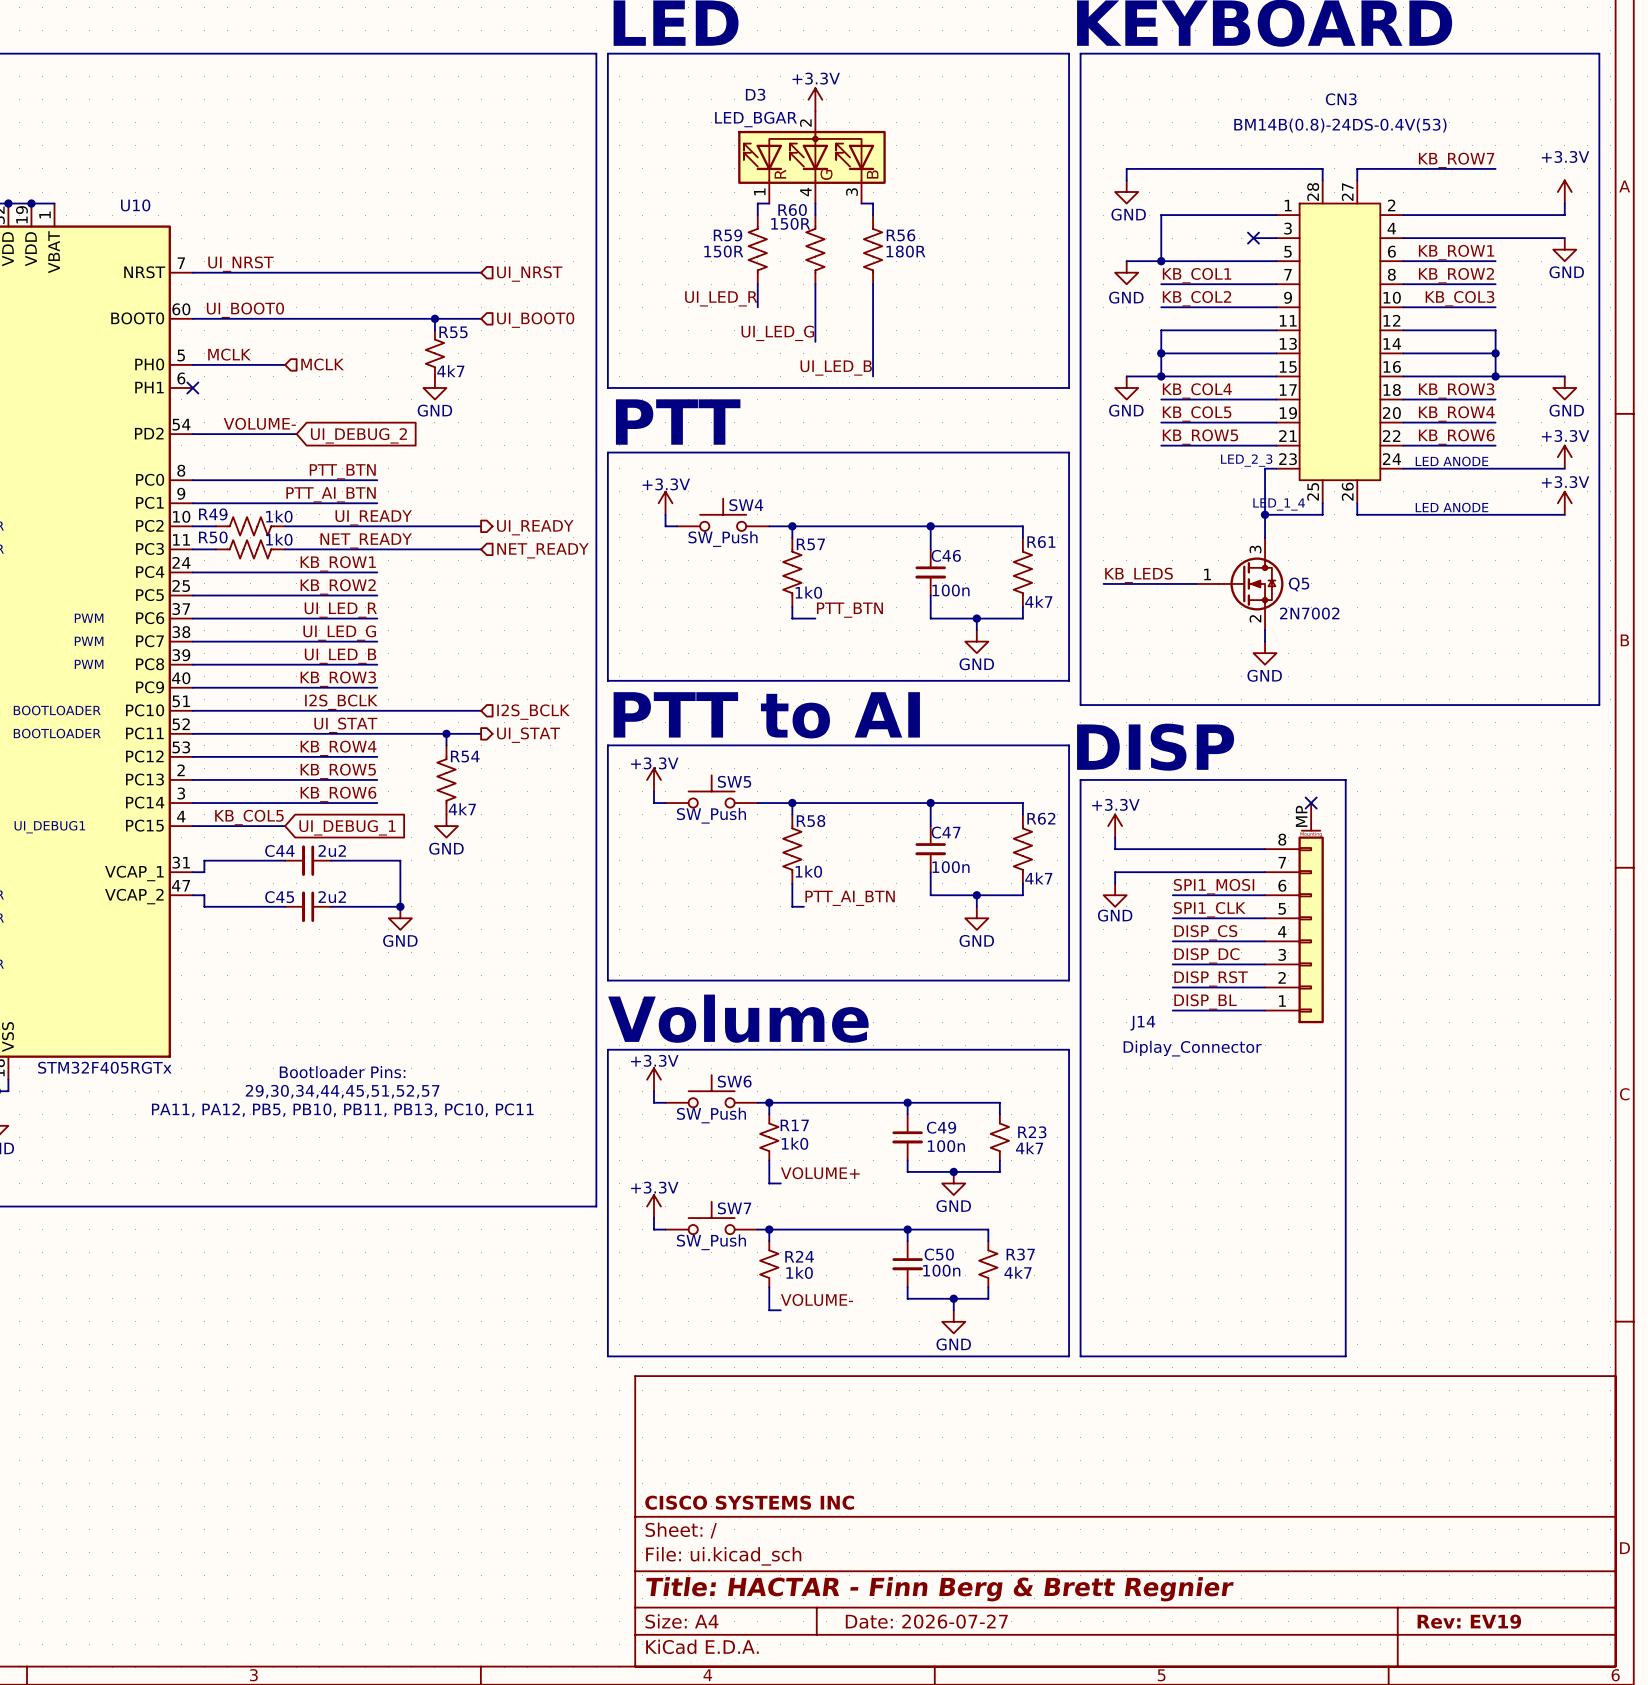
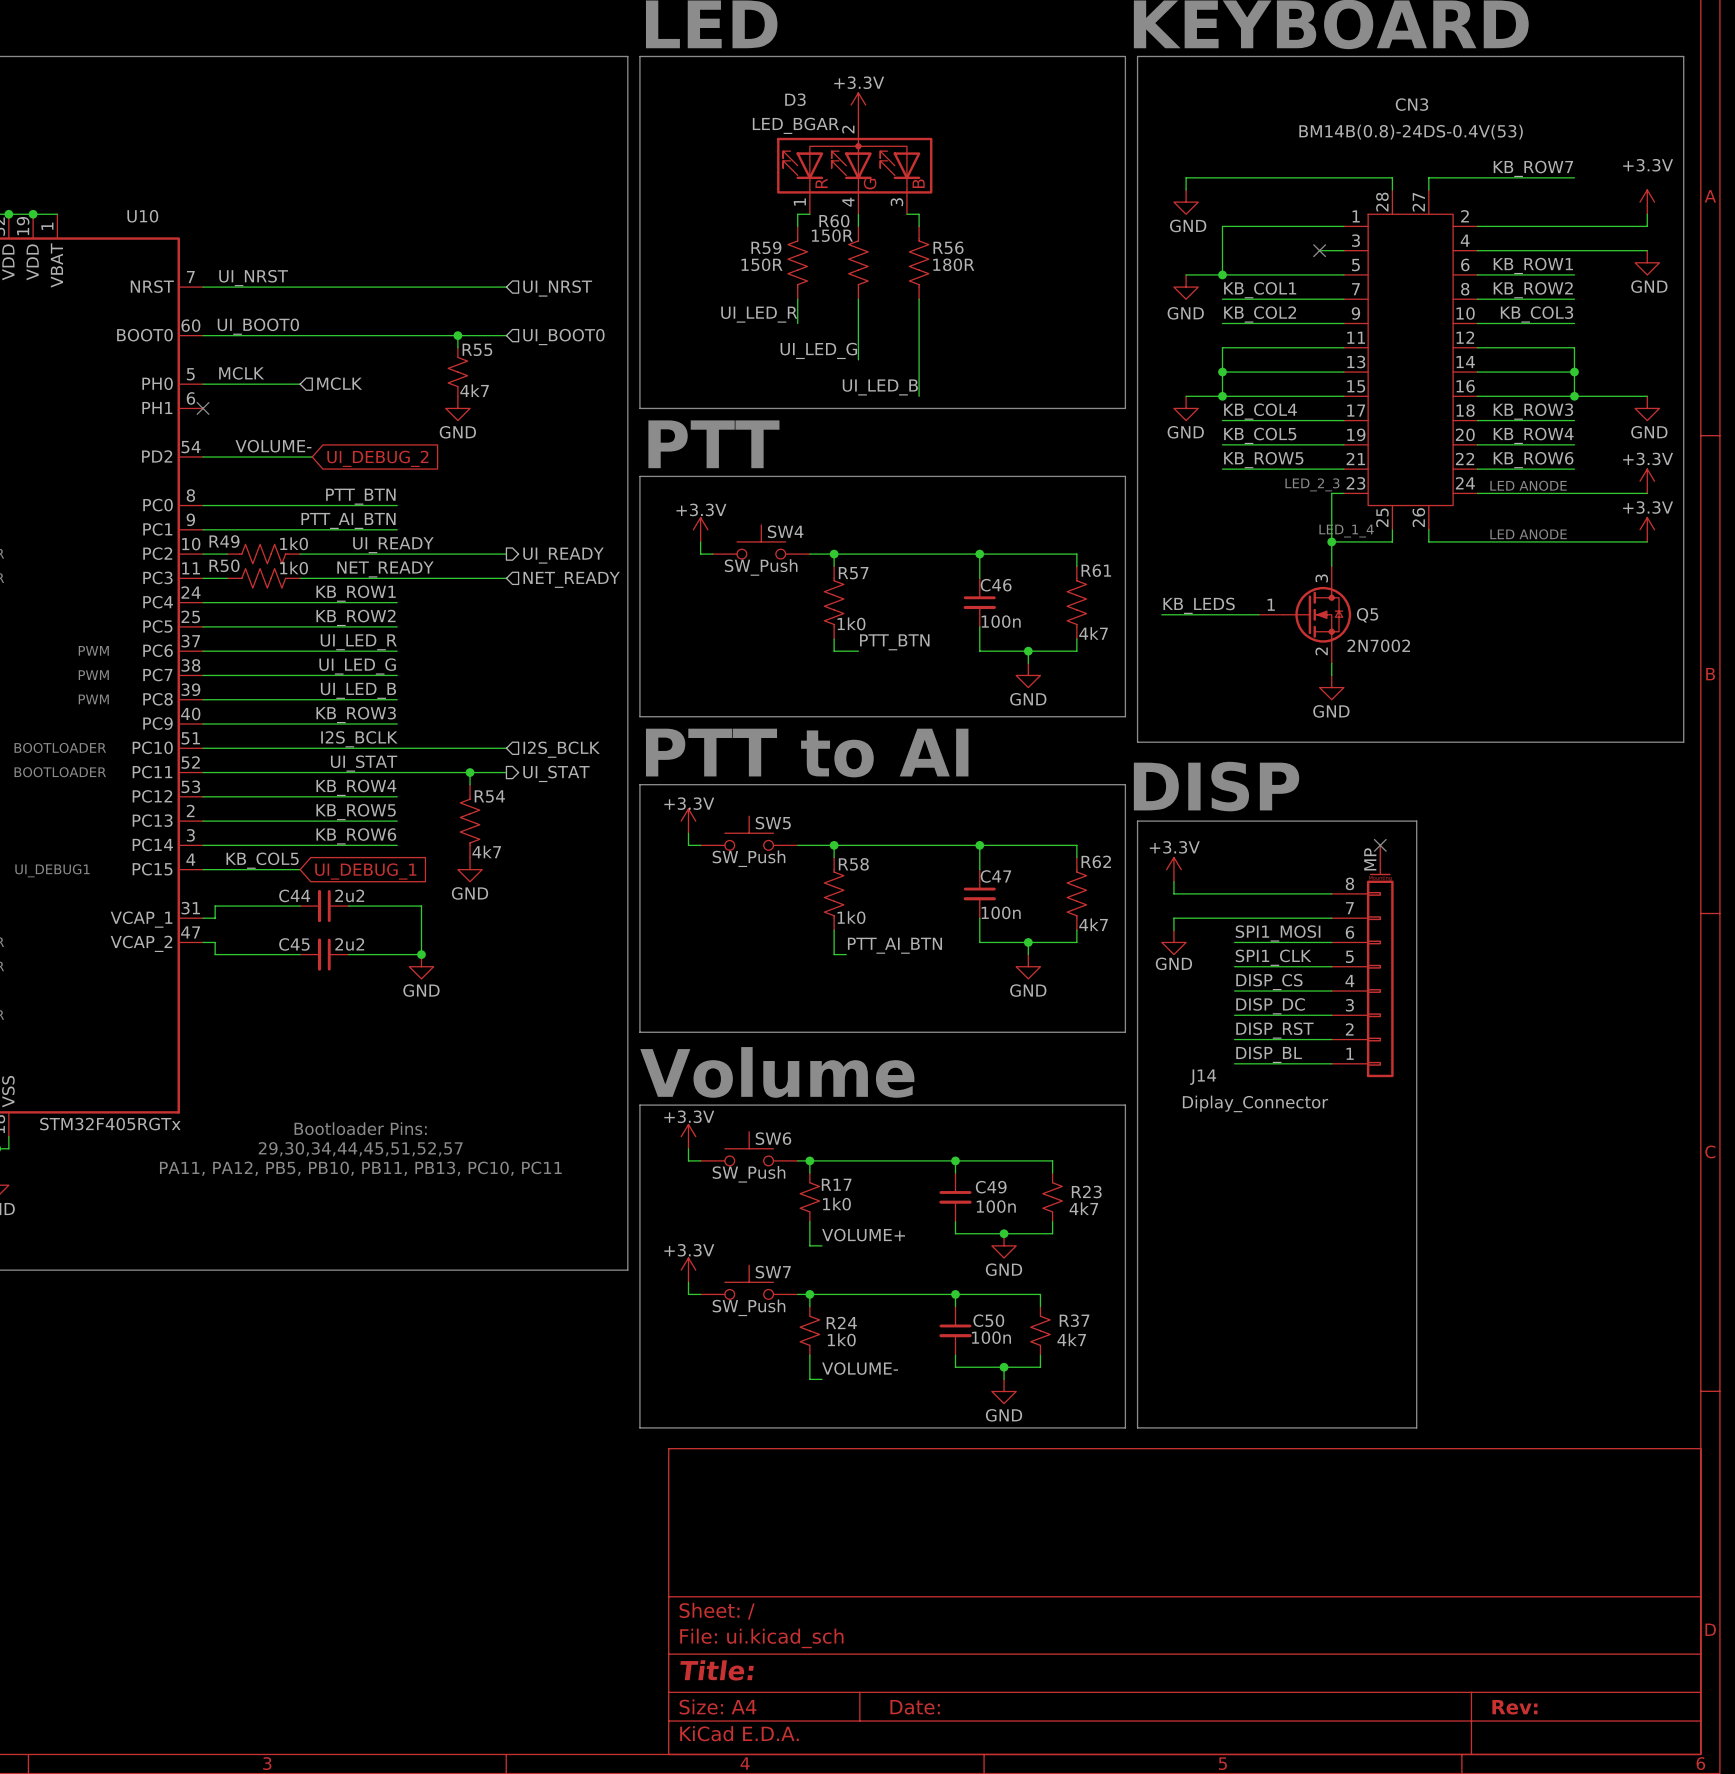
title block: CISCO SYSTEMS INC (749, 1502) -> none
title block: Title: HACTAR - Finn Berg & Brett Regnier (939, 1589) -> Title: (717, 1670)
title block: Date: 2026-07-27 (926, 1621) -> Date: (915, 1707)
title block: Rev: EV19 (1469, 1621) -> Rev: (1514, 1707)

